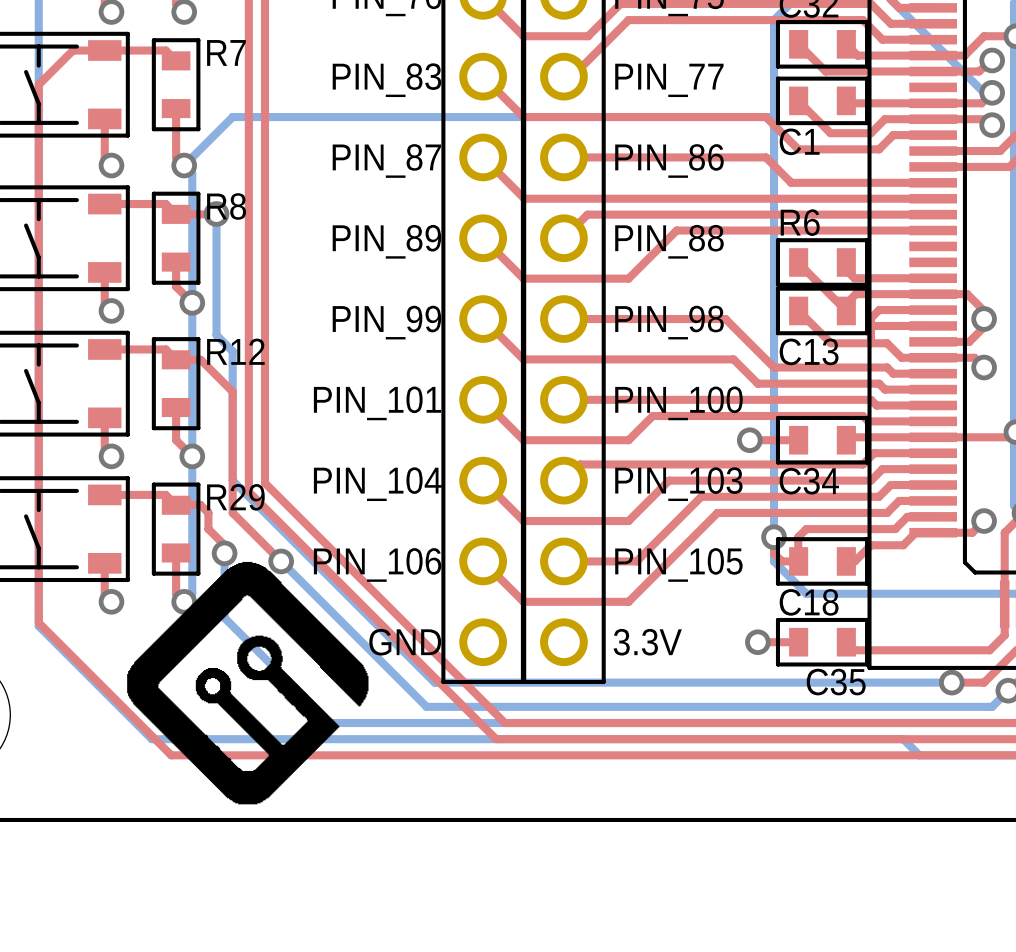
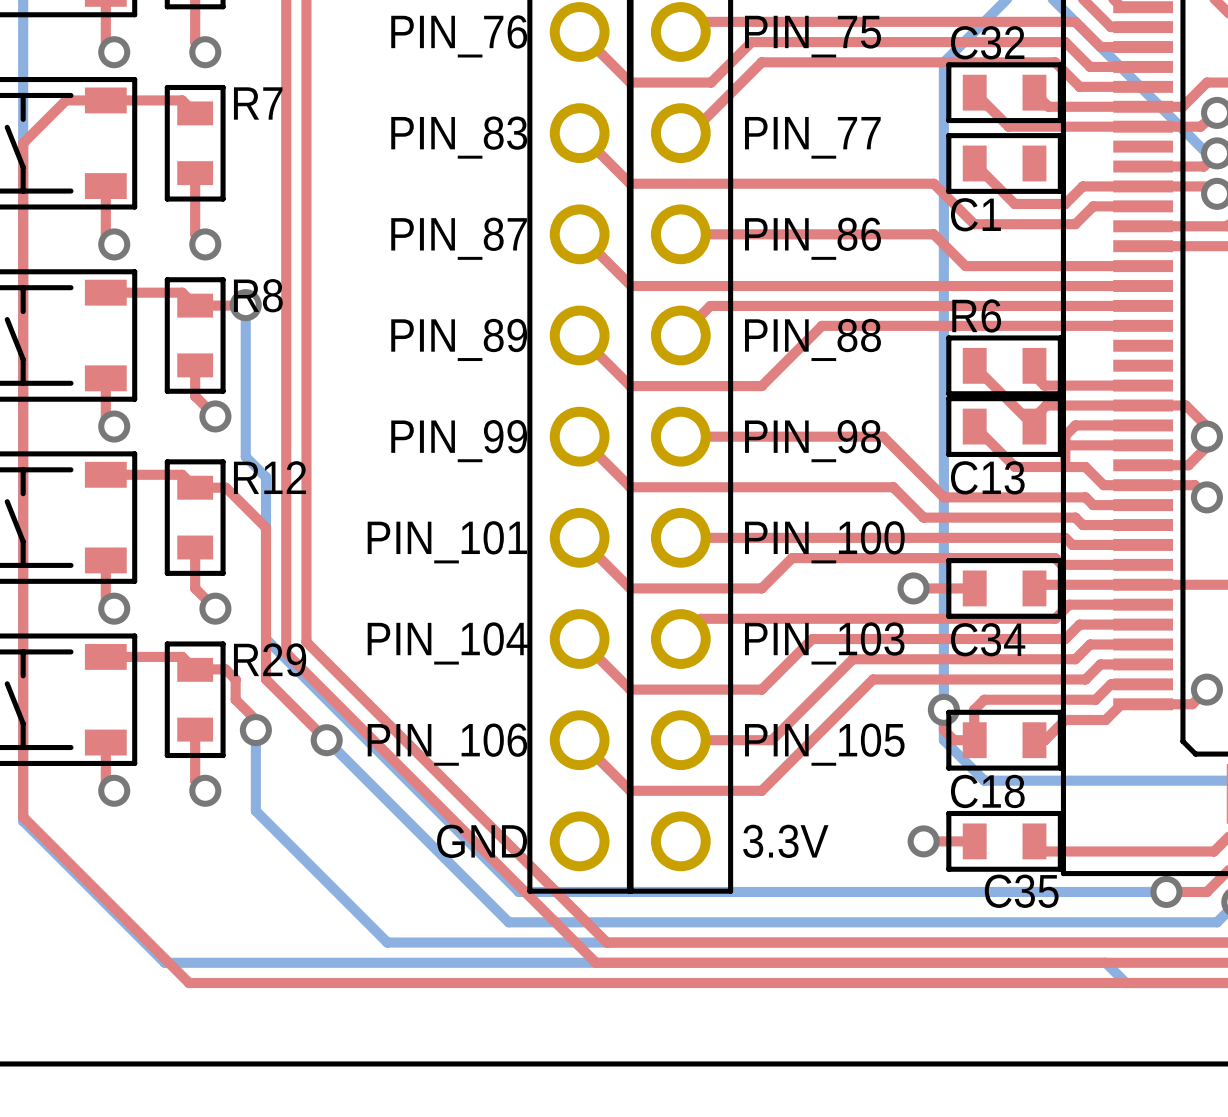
top track: (846, 100) (848, 103) (933, 103) -> none
bottom track: (774, 117) (232, 117) (184, 165) (192, 173) (192, 593) (184, 601) -> none
drawing: [127, 561, 369, 805] -> none

